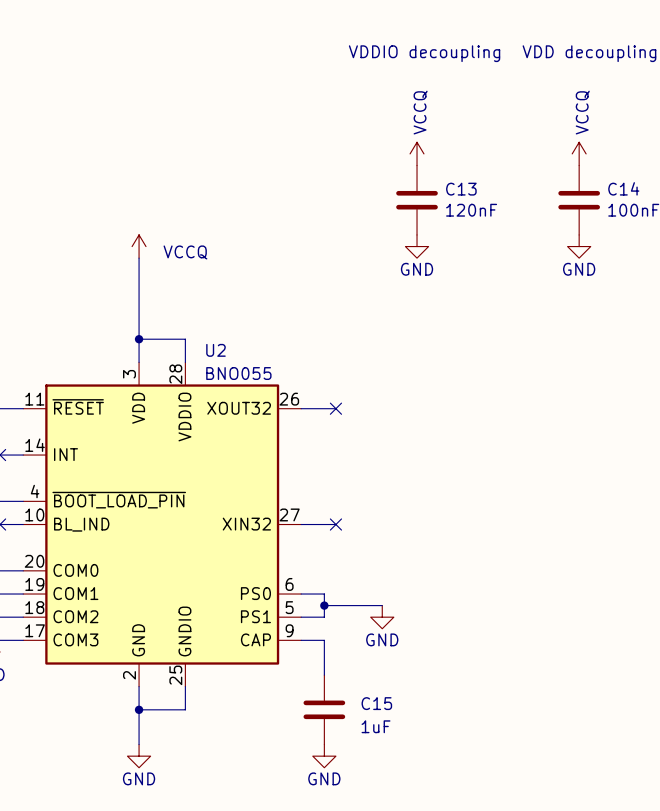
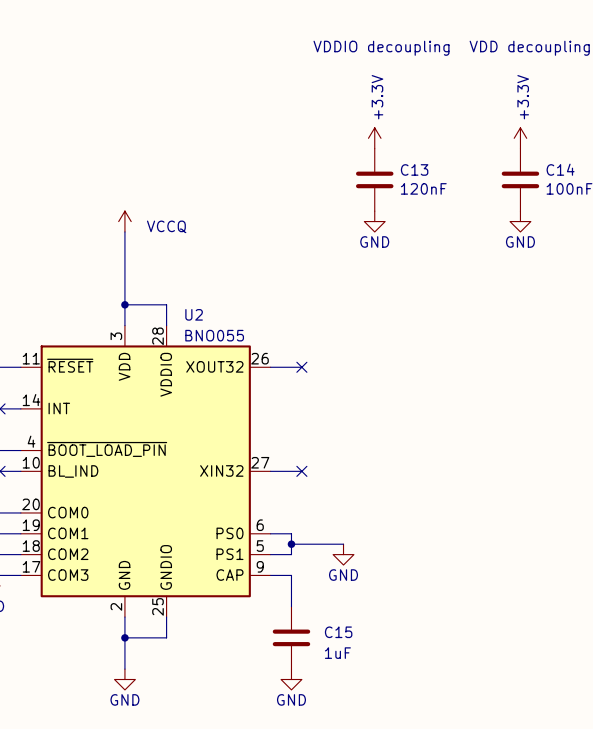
power symbol: VCCQ (417, 153) -> +3.3V (374, 138)
power symbol: VCCQ (579, 153) -> +3.3V (520, 138)

